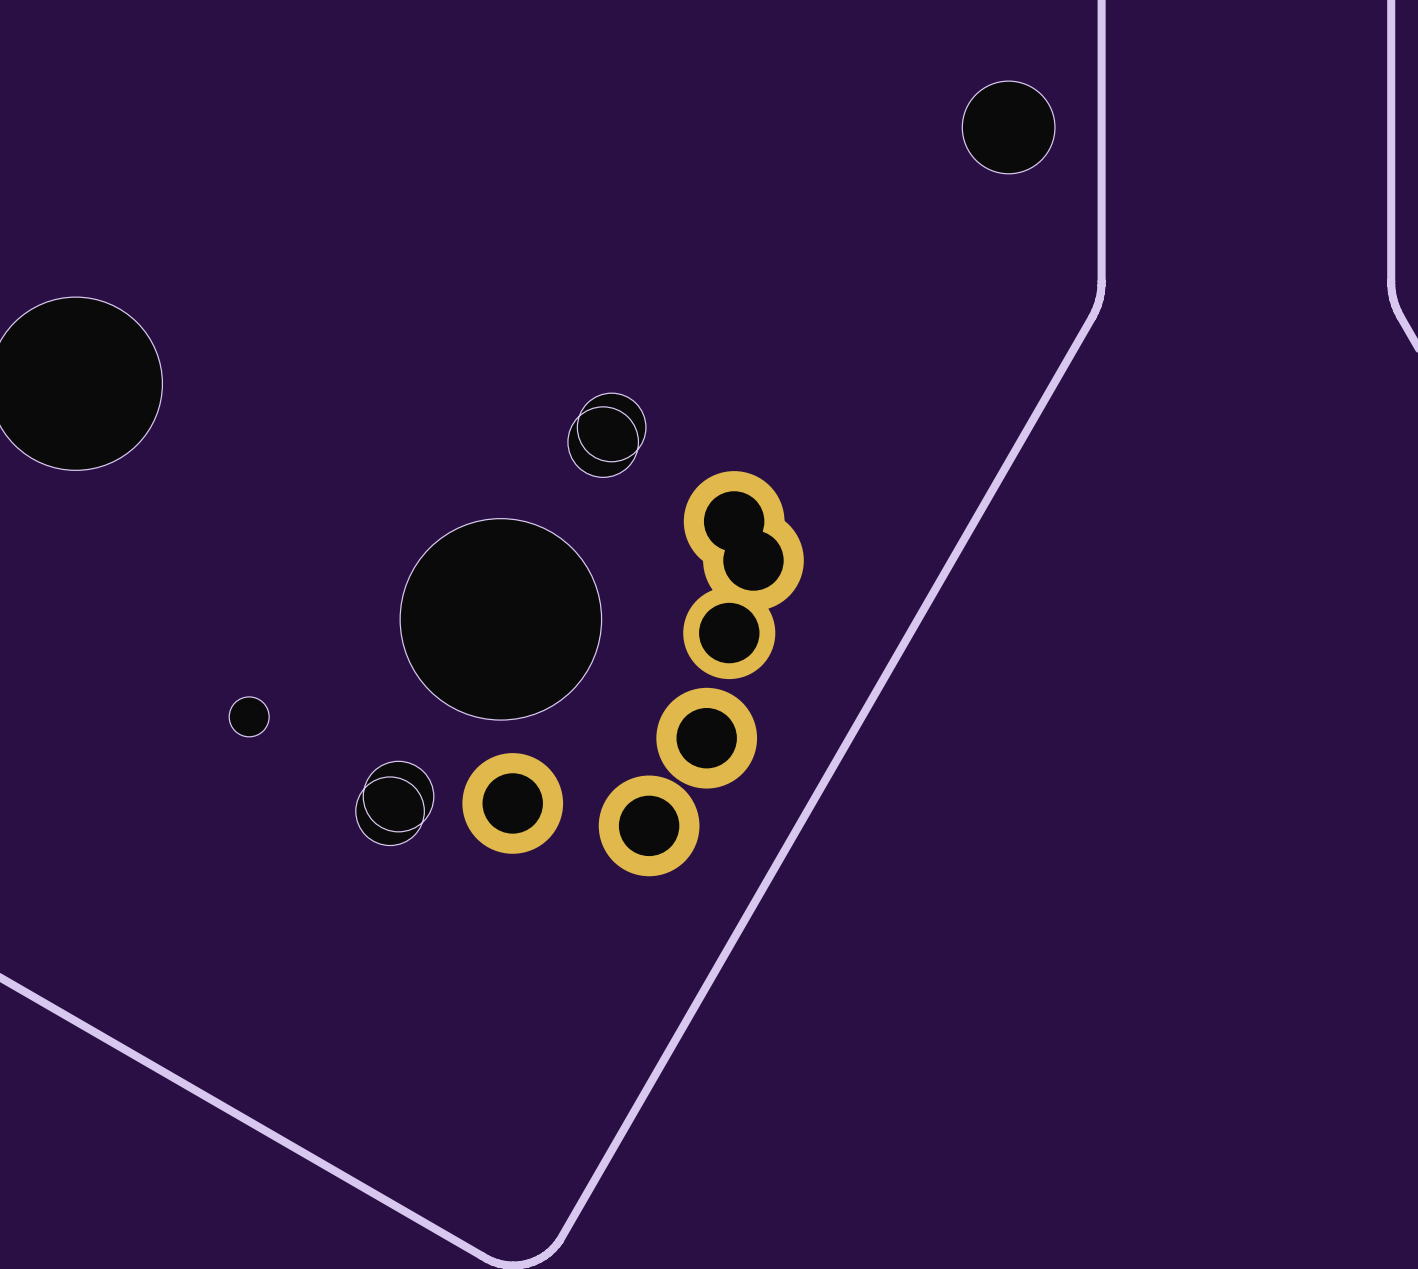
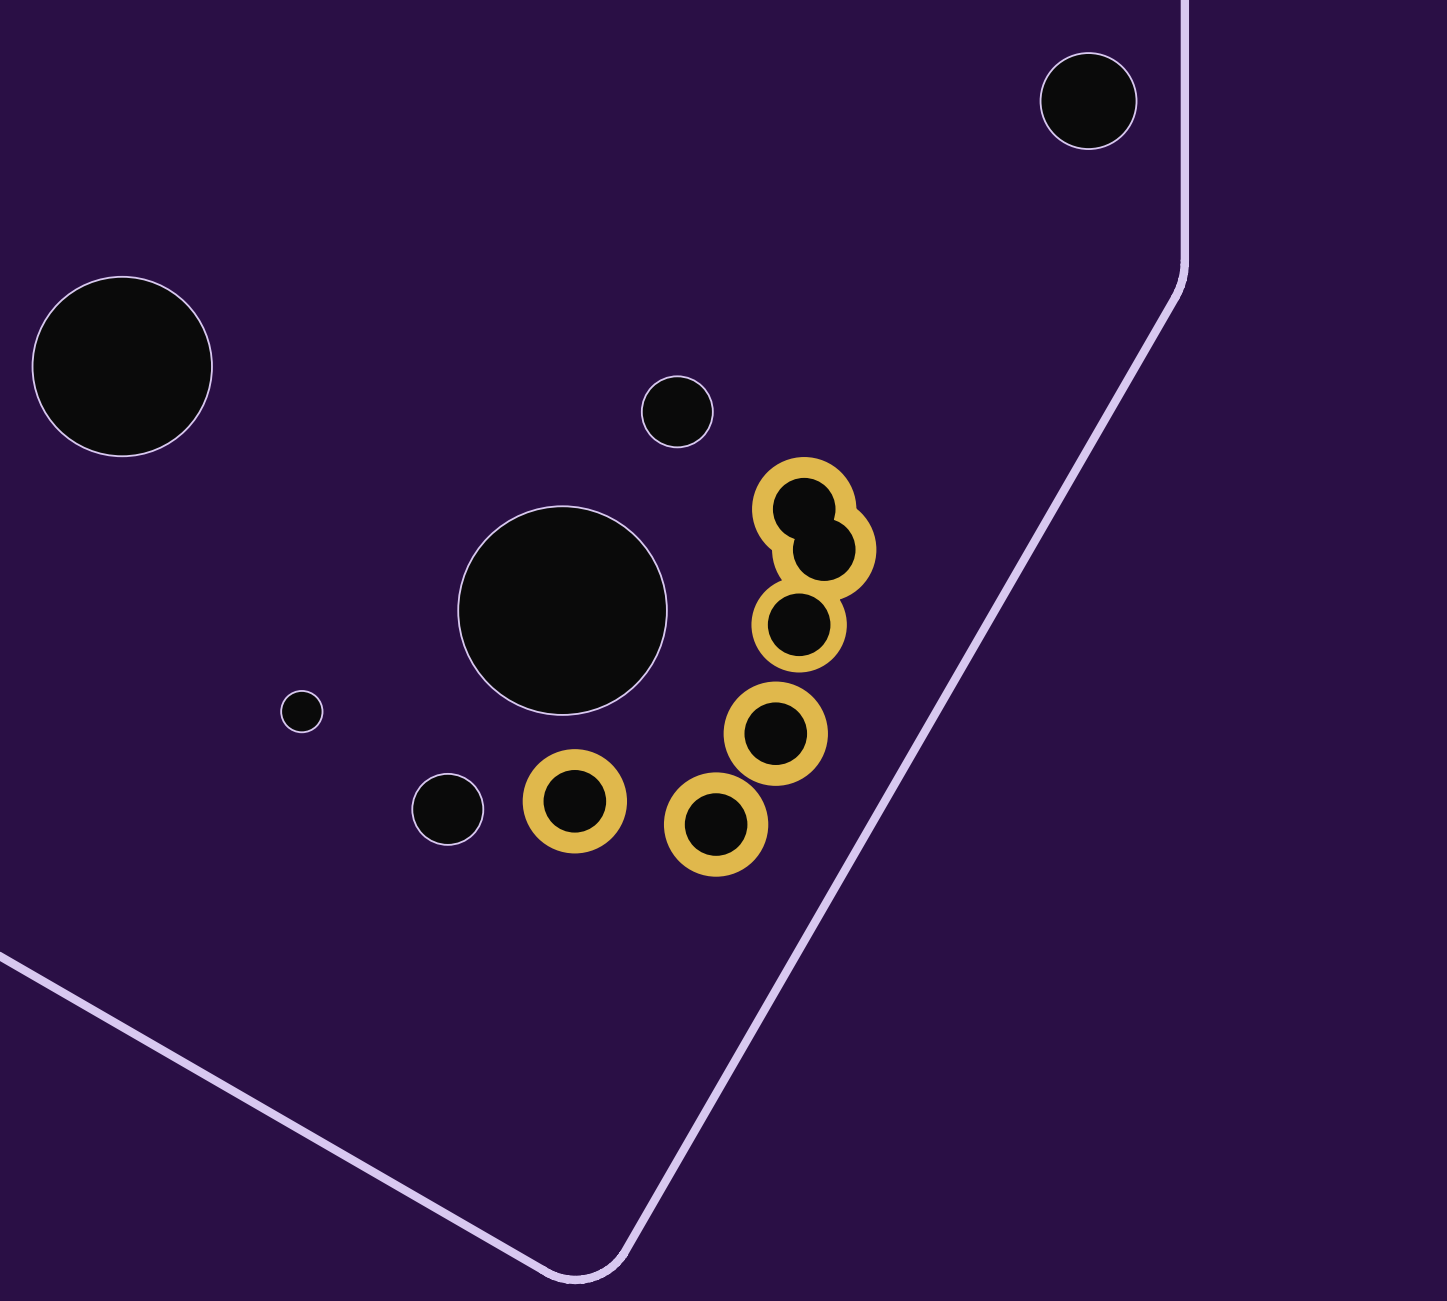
part footprint: [229, 393, 804, 877] -> [281, 376, 877, 877]

